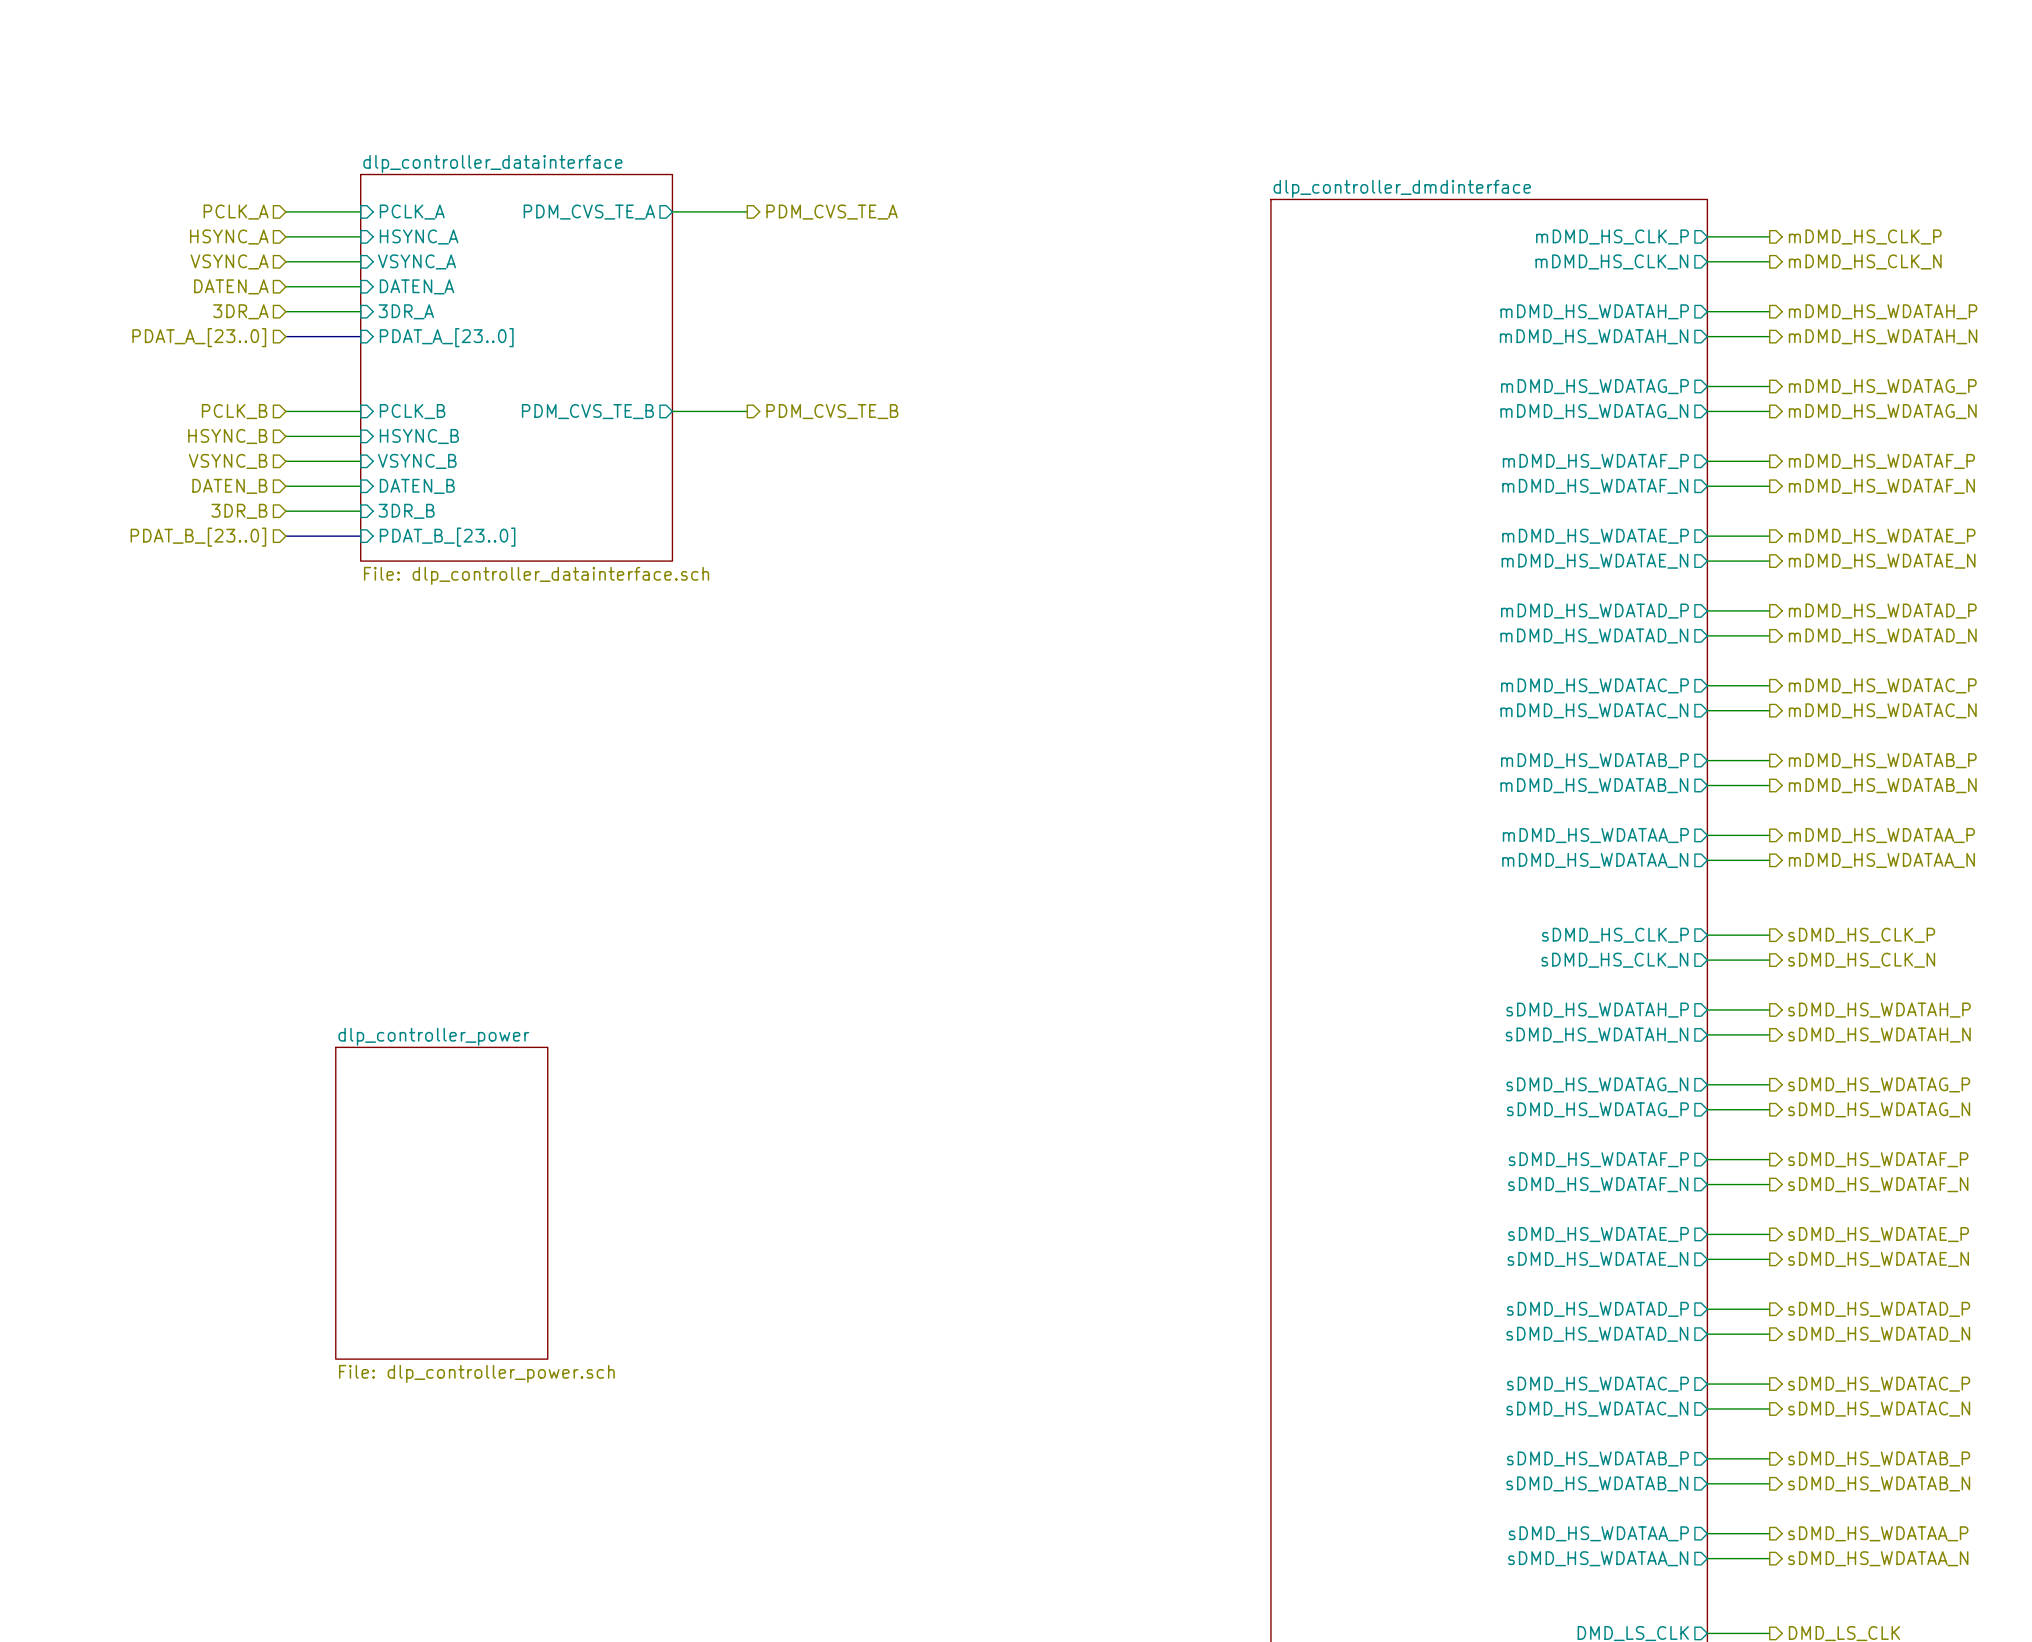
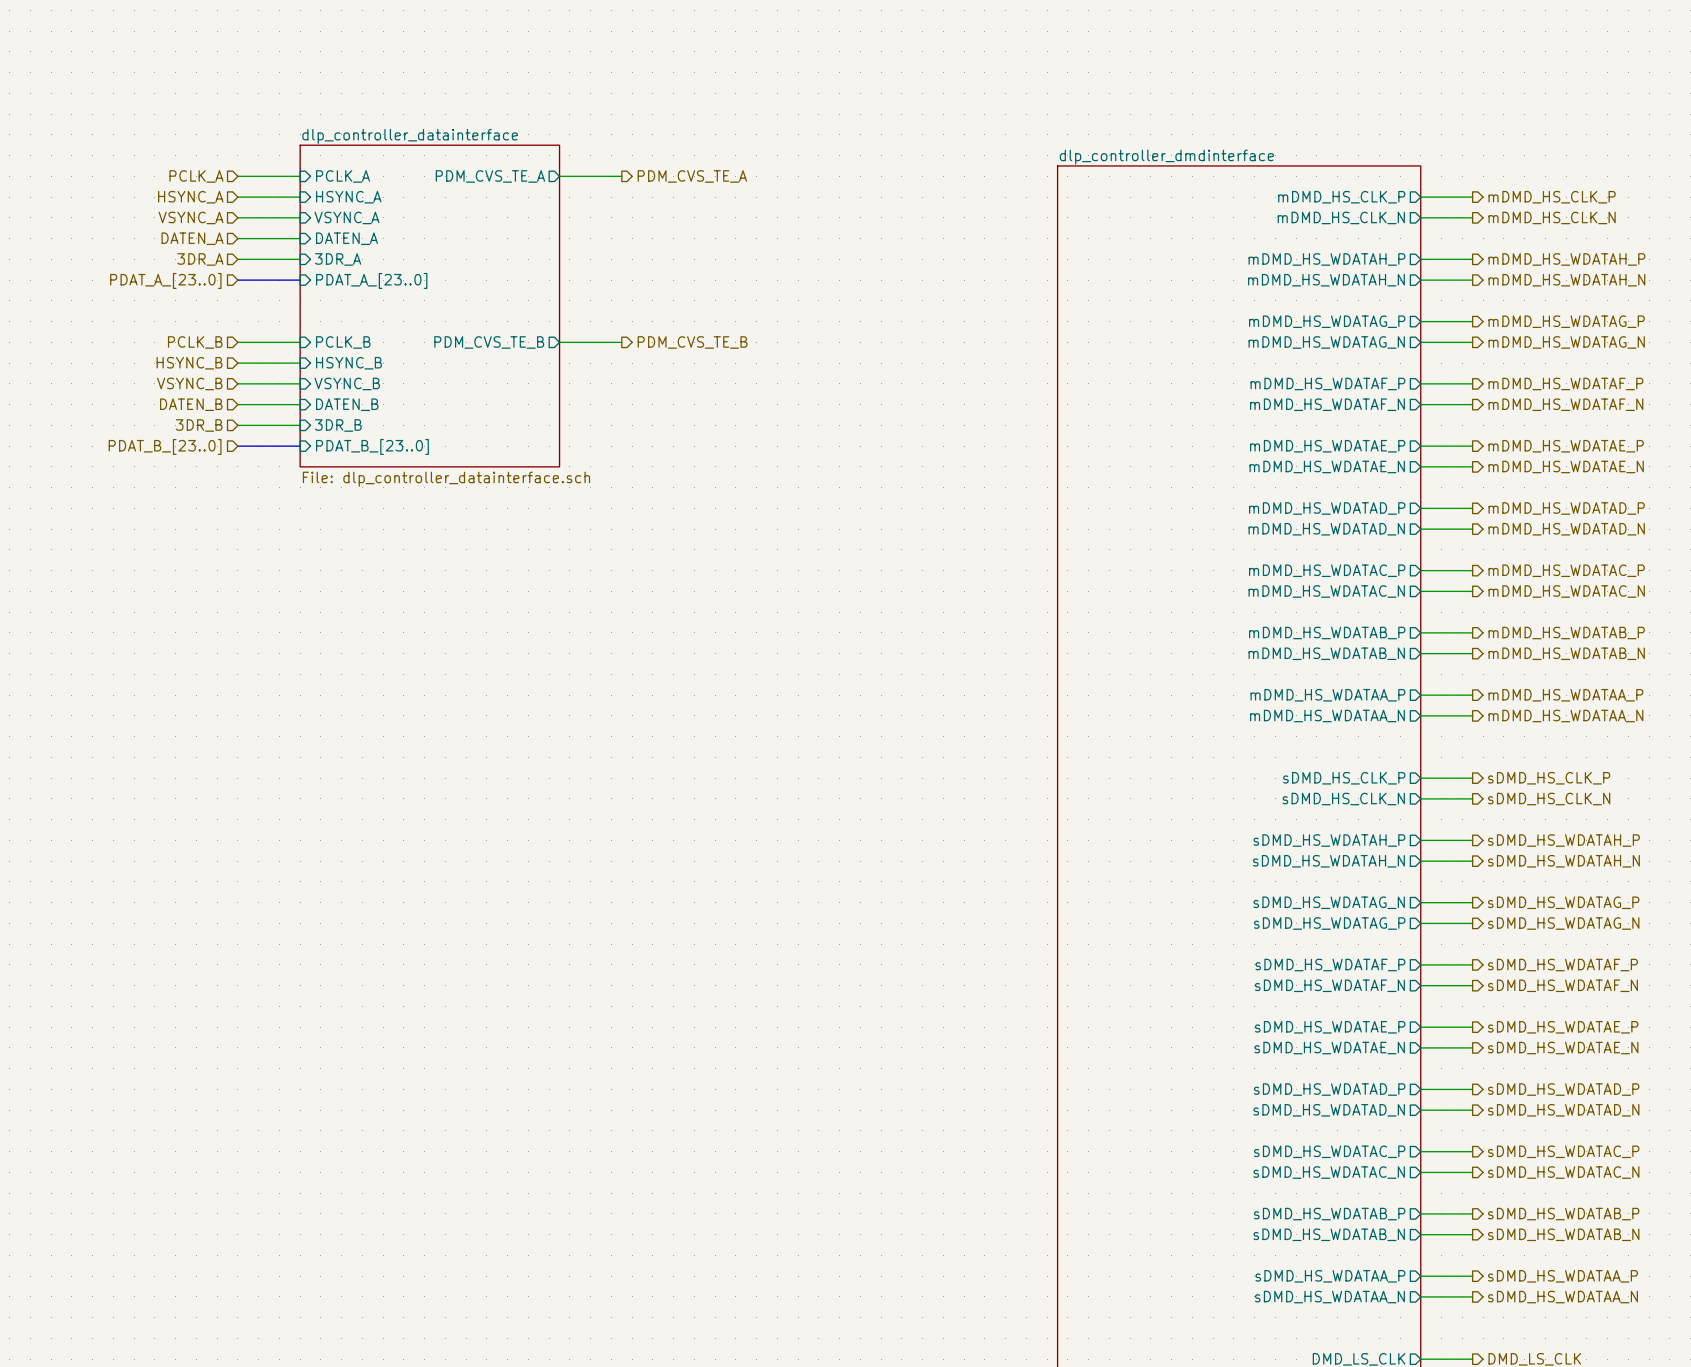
sheet dlp_controller_power: File: dlp_controller_power.sch (441, 1203) -> none

